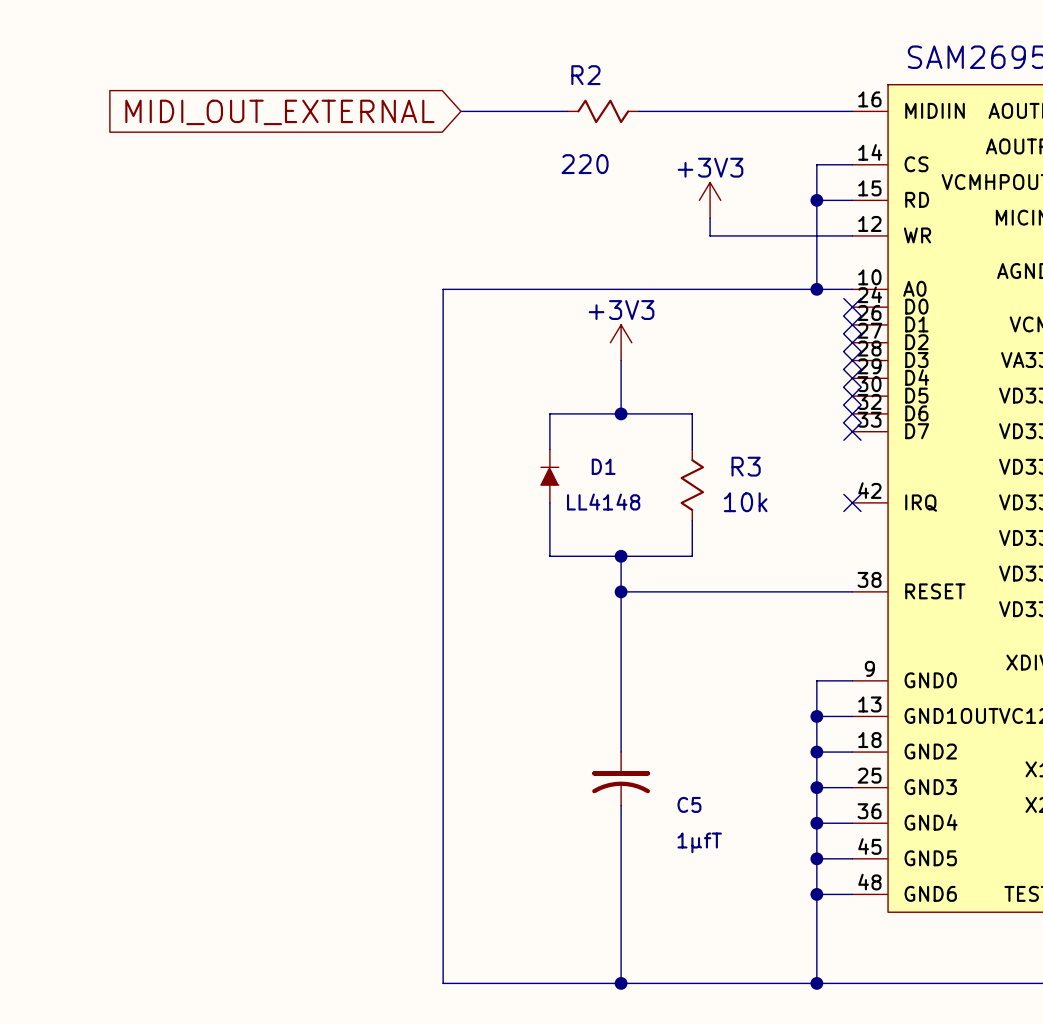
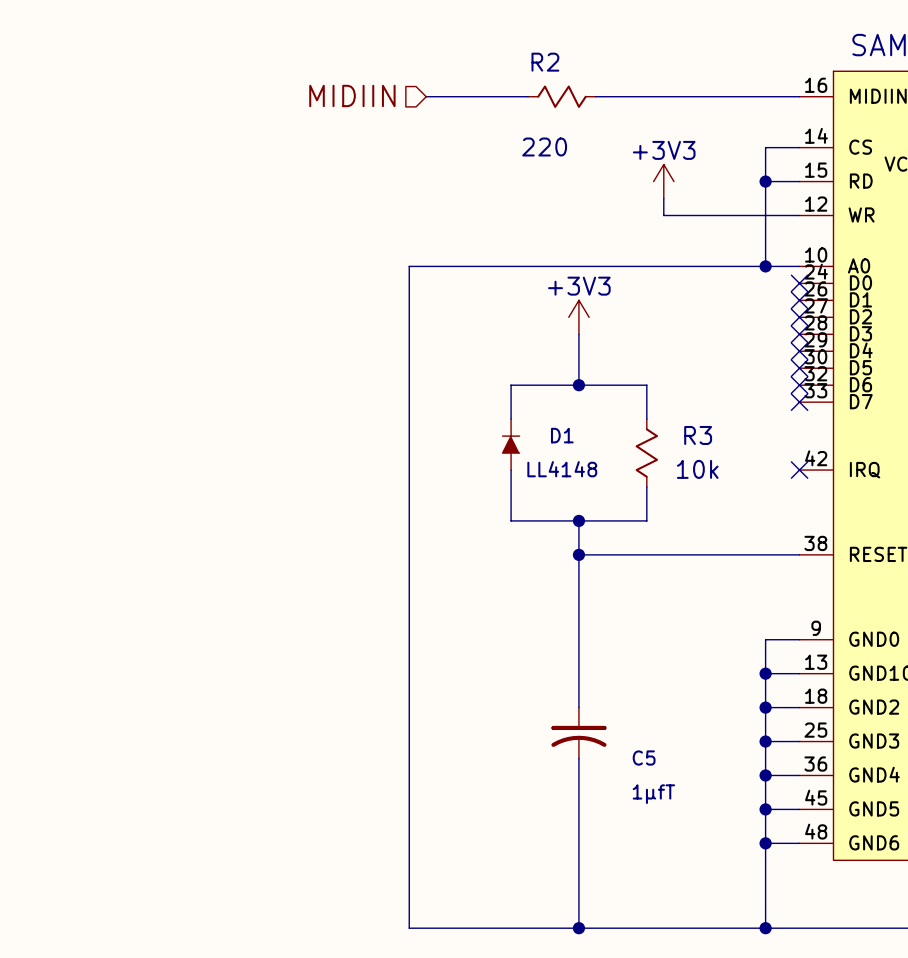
hierarchical label: none -> MIDIIN (352, 95)
global label: MIDI_OUT_EXTERNAL (279, 112) -> none

